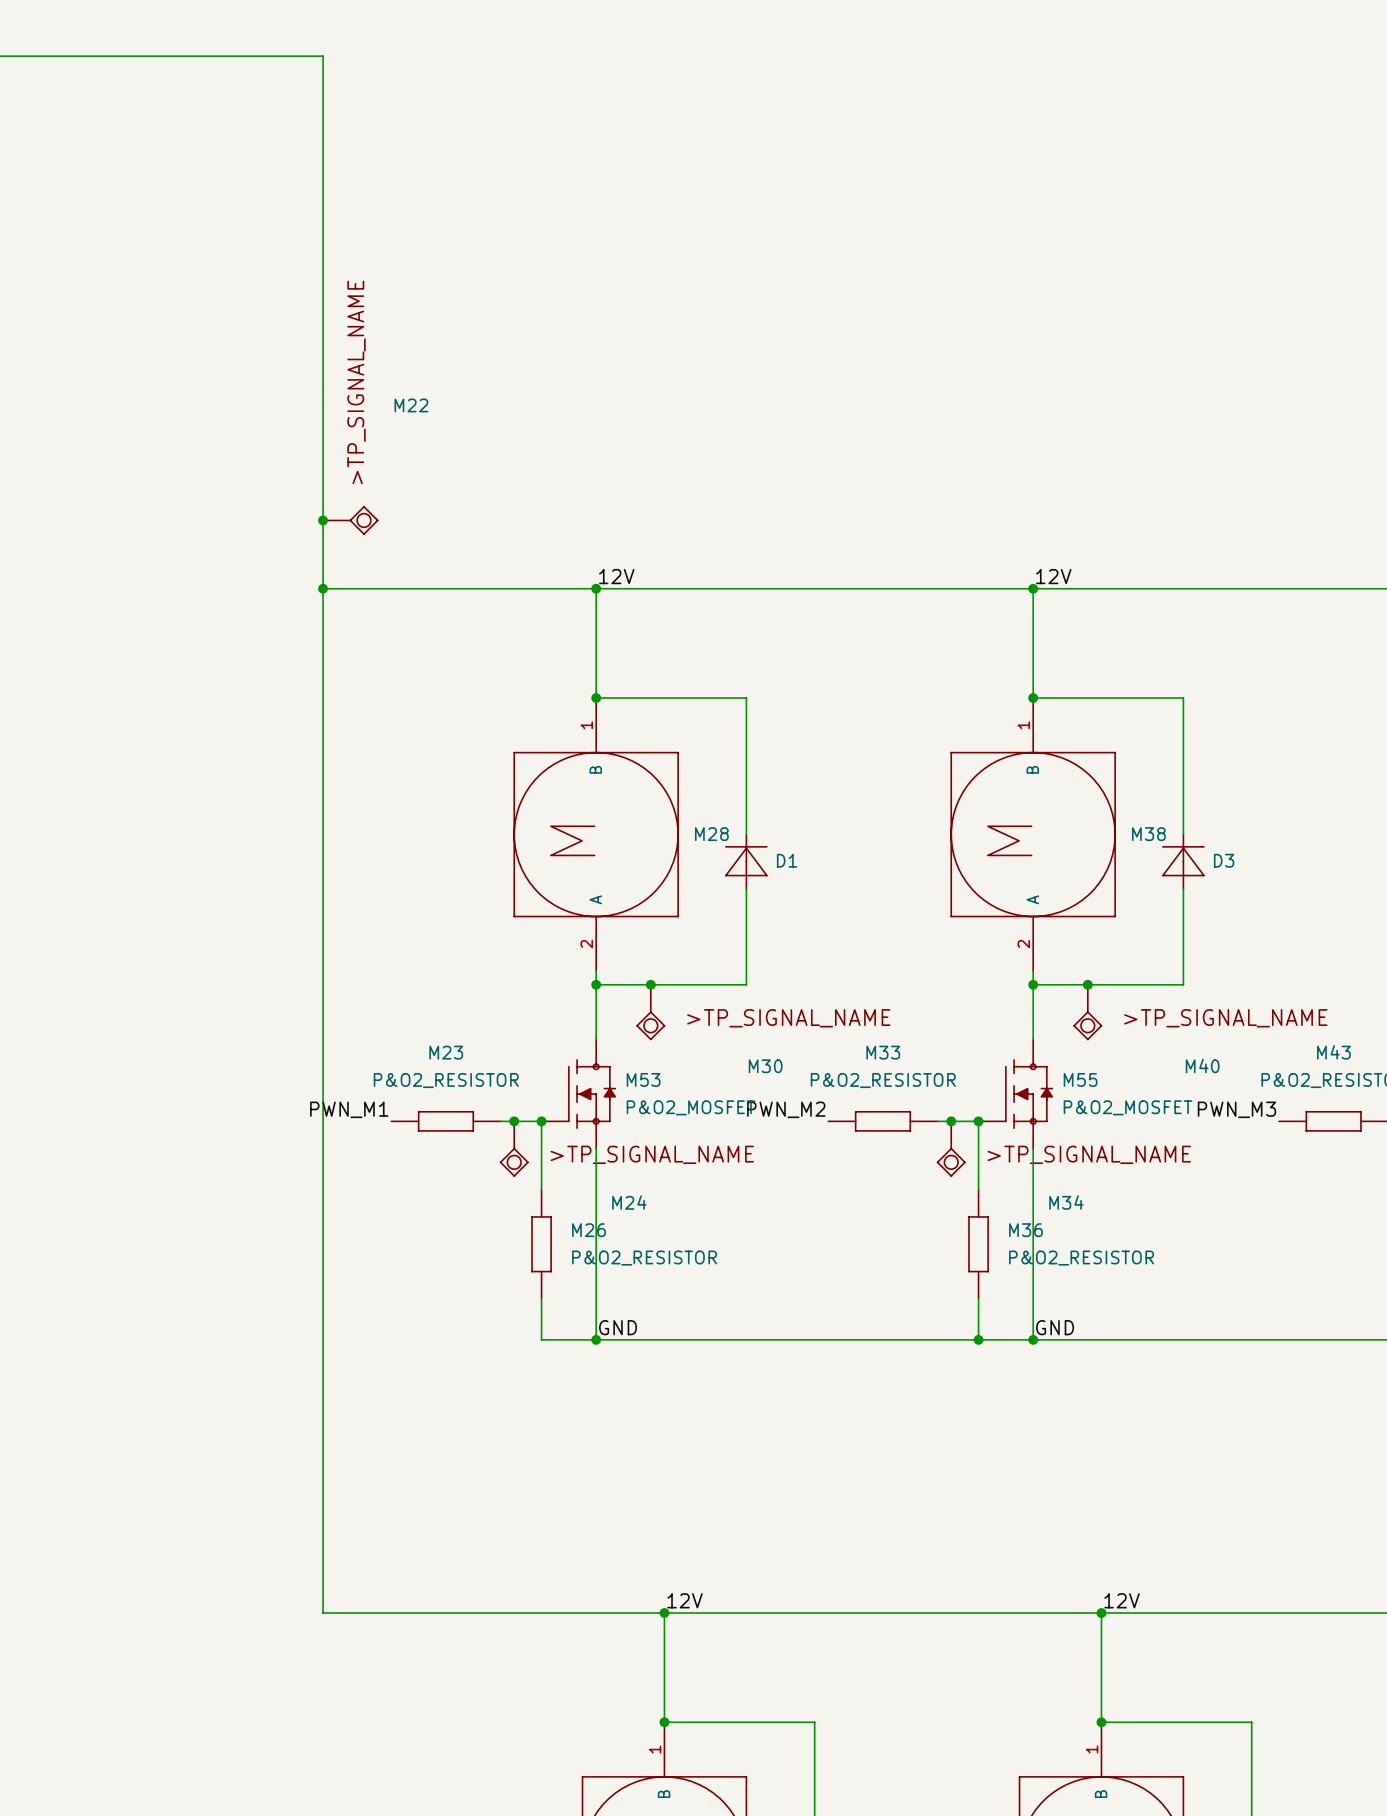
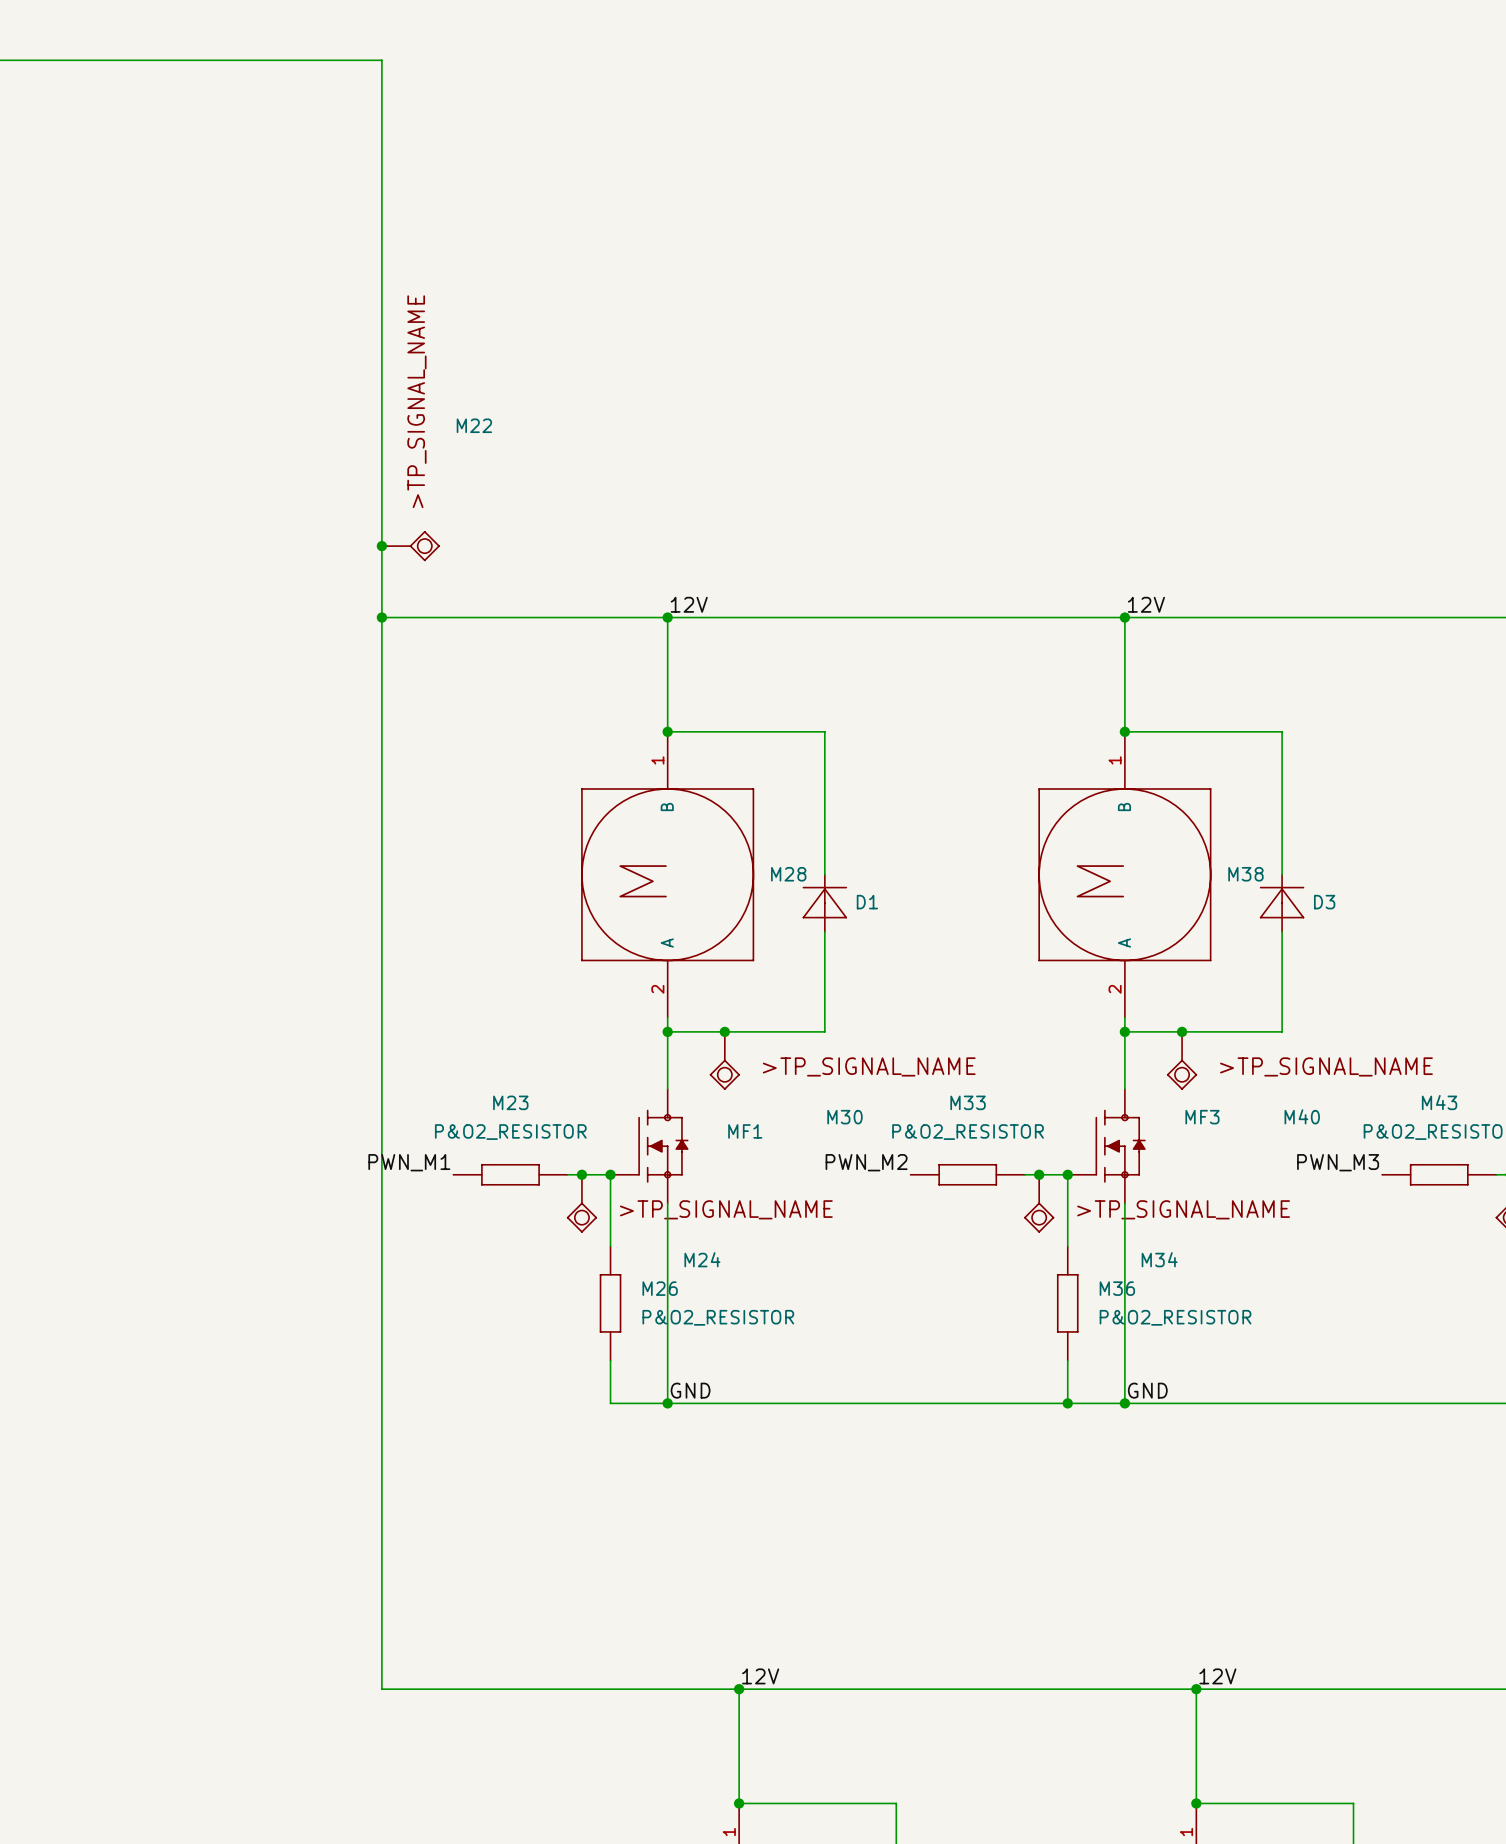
M53 name: M53 (643, 1079) -> MF1 (745, 1131)
M55 name: M55 (1080, 1079) -> MF3 (1202, 1117)
M53 value: P&O2_MOSFET (690, 1107) -> none
M55 value: P&O2_MOSFET (1128, 1107) -> none

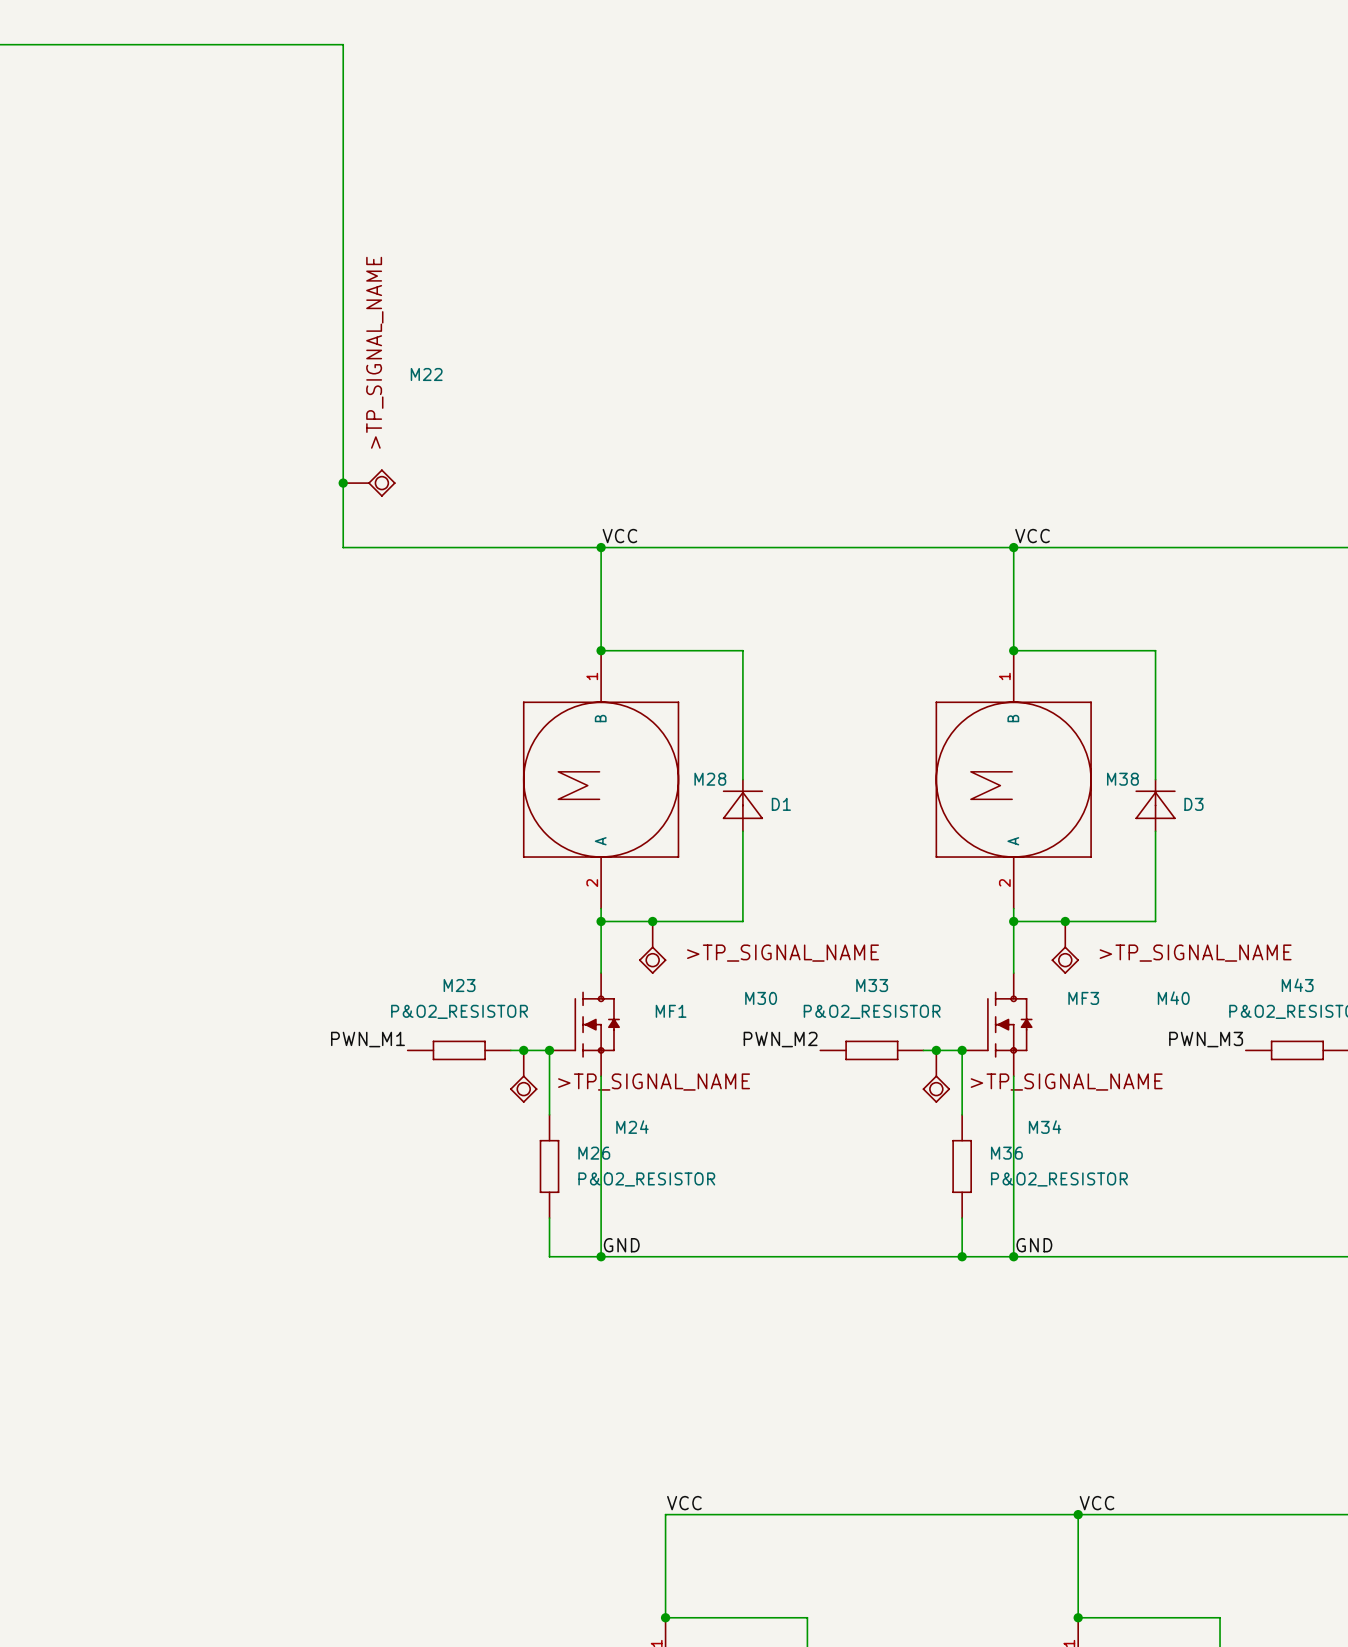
label: 12V (689, 604) -> VCC (619, 536)
label: 12V (1146, 604) -> VCC (1032, 536)
wire: (381, 617) (381, 1689) (739, 1689) -> none
junction: (381, 617) -> none
label: 12V (760, 1676) -> VCC (684, 1503)
label: 12V (1217, 1676) -> VCC (1097, 1503)
junction: (739, 1689) -> none

